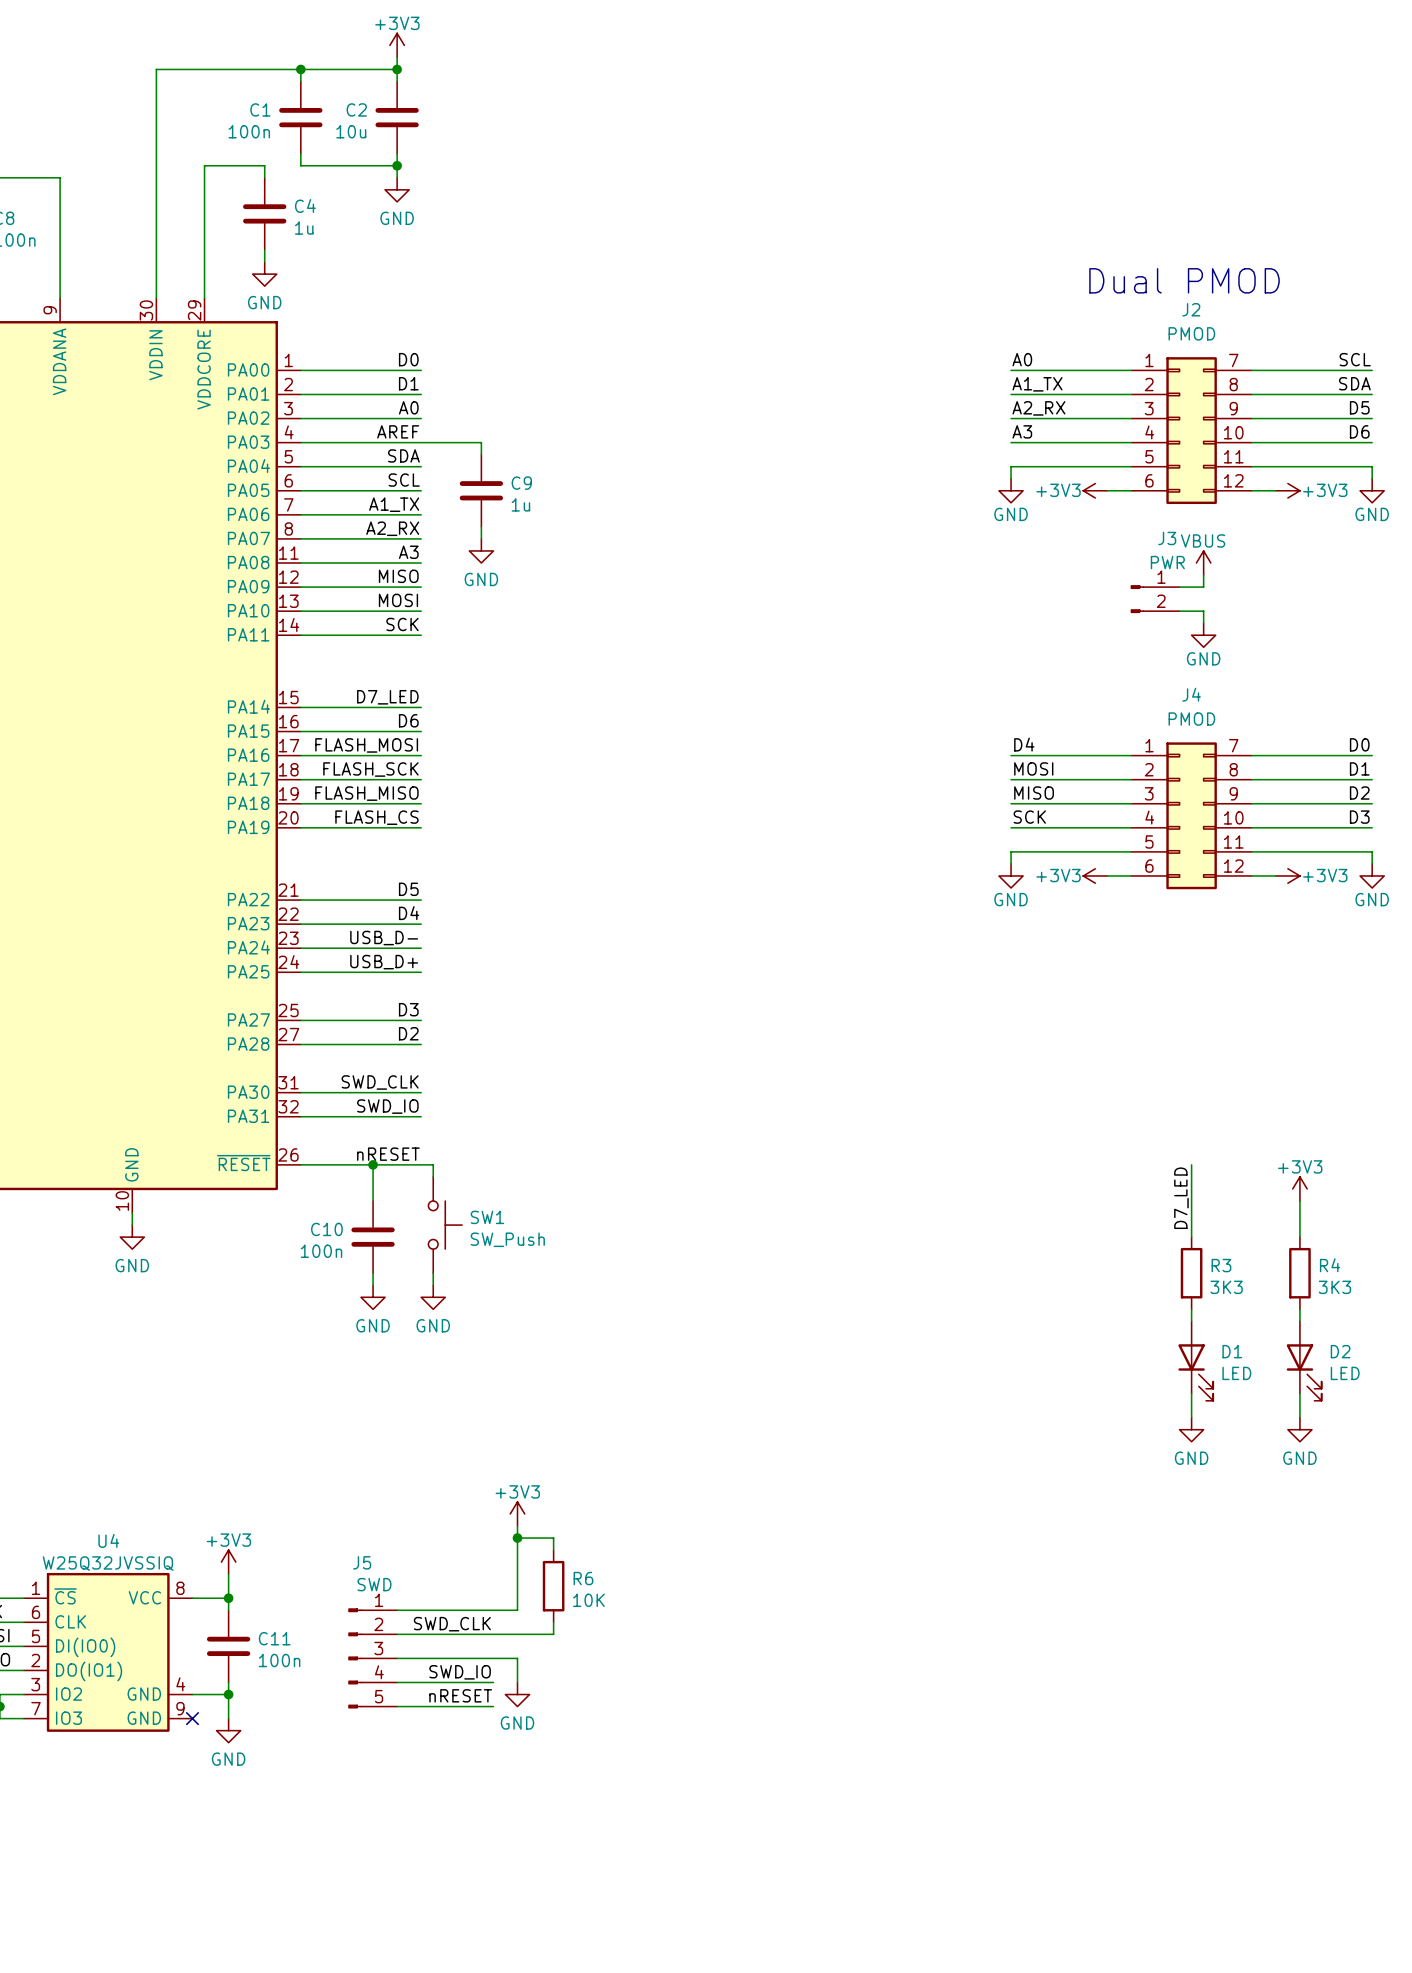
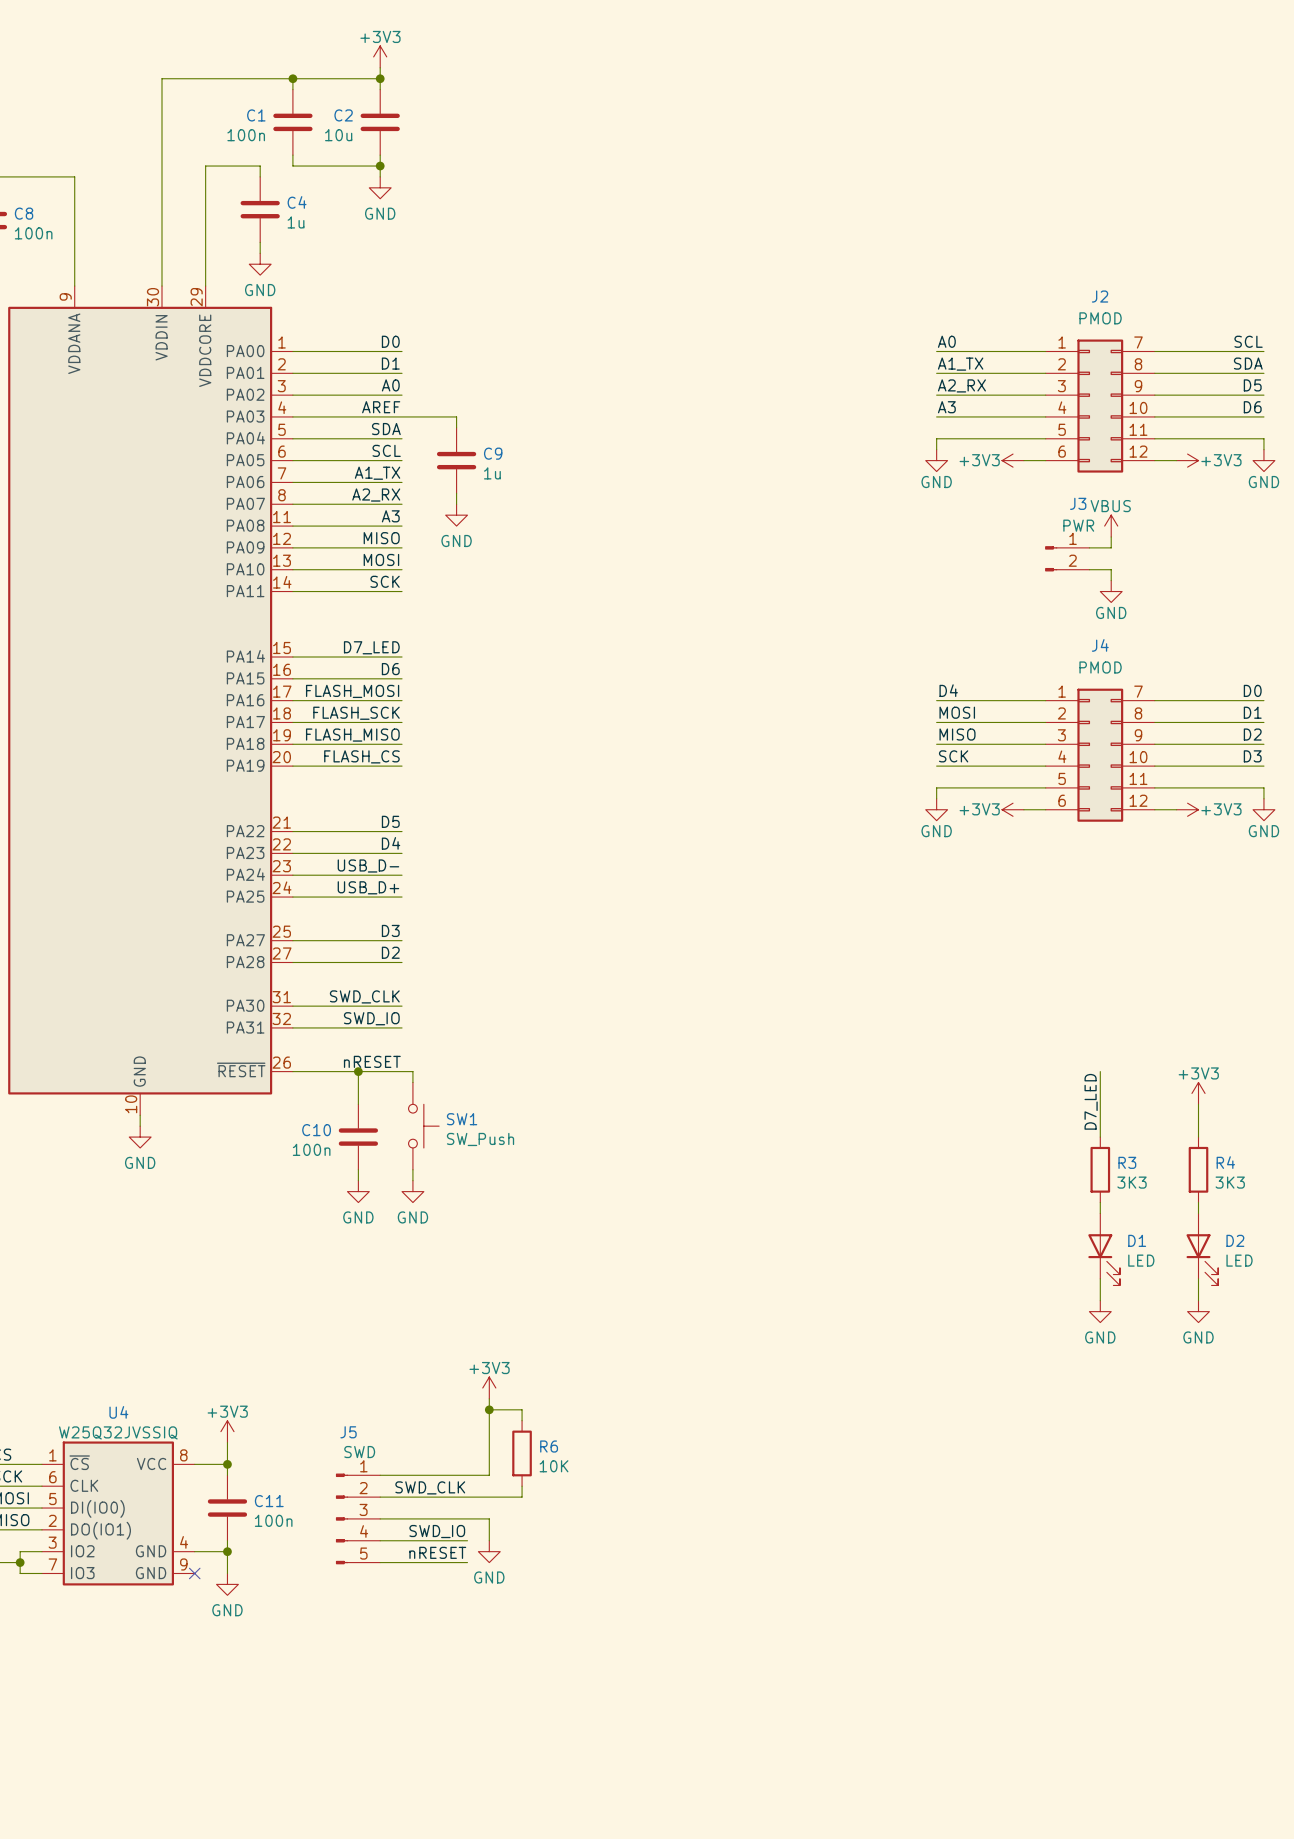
text: Dual PMOD (1184, 280) -> none

